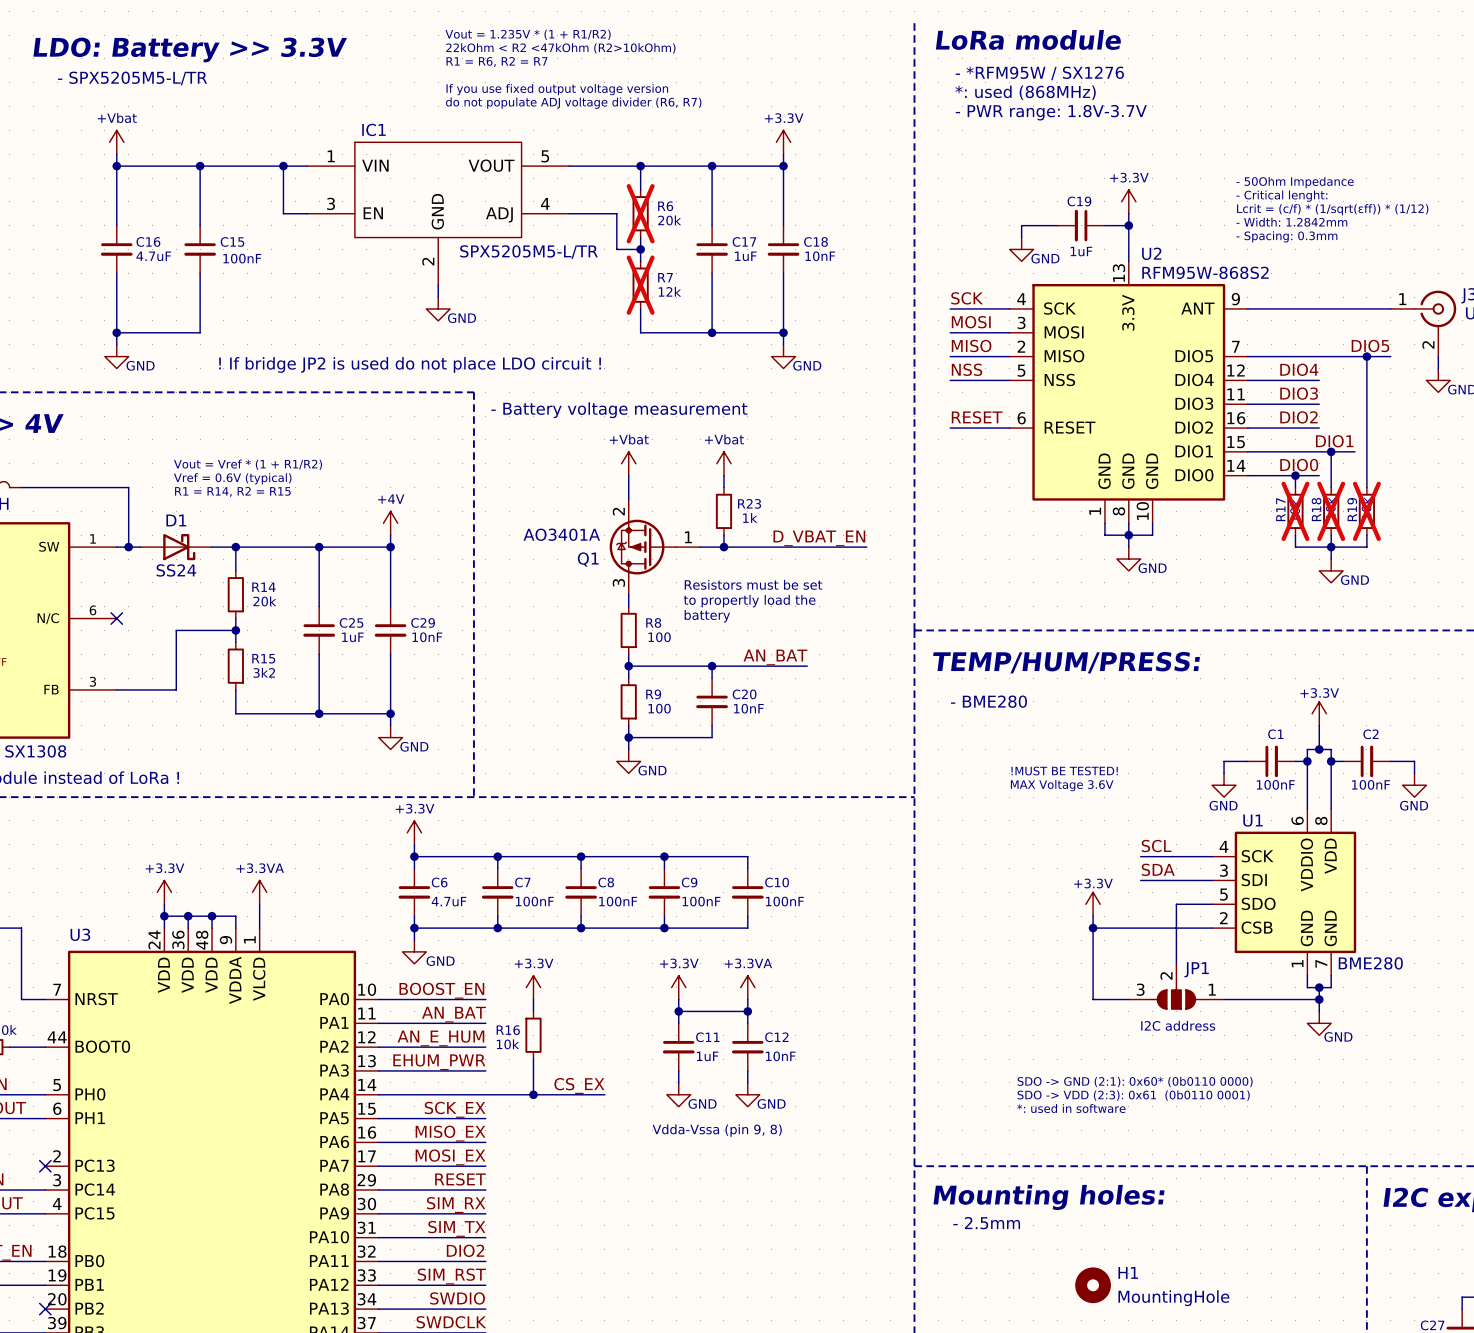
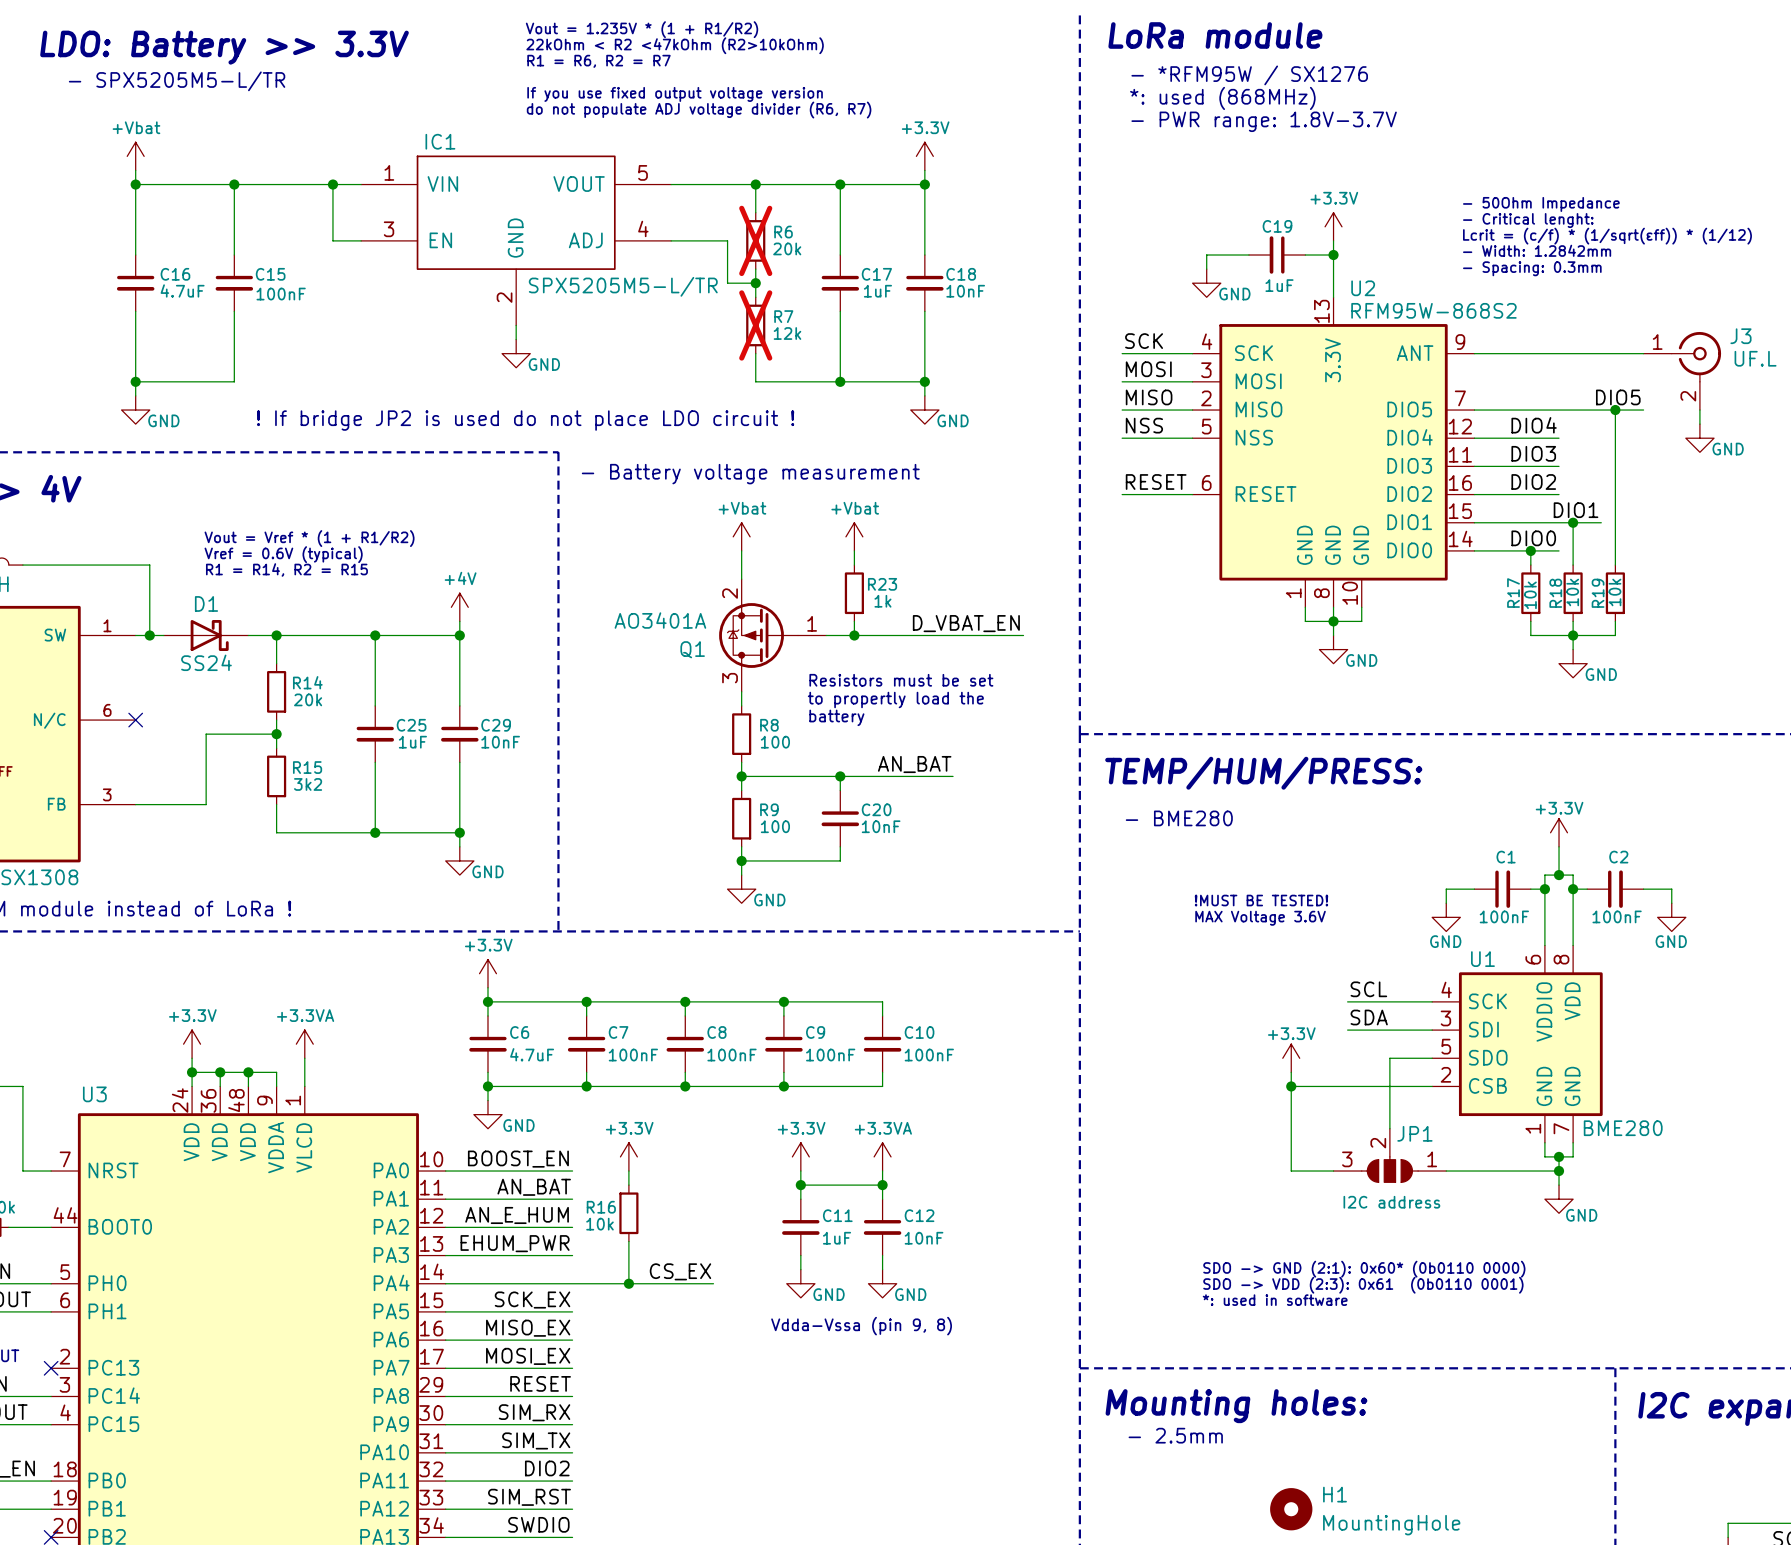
R17 do-not-place cross: (1295, 511) -> none
R18 do-not-place cross: (1331, 511) -> none
R19 do-not-place cross: (1366, 511) -> none

